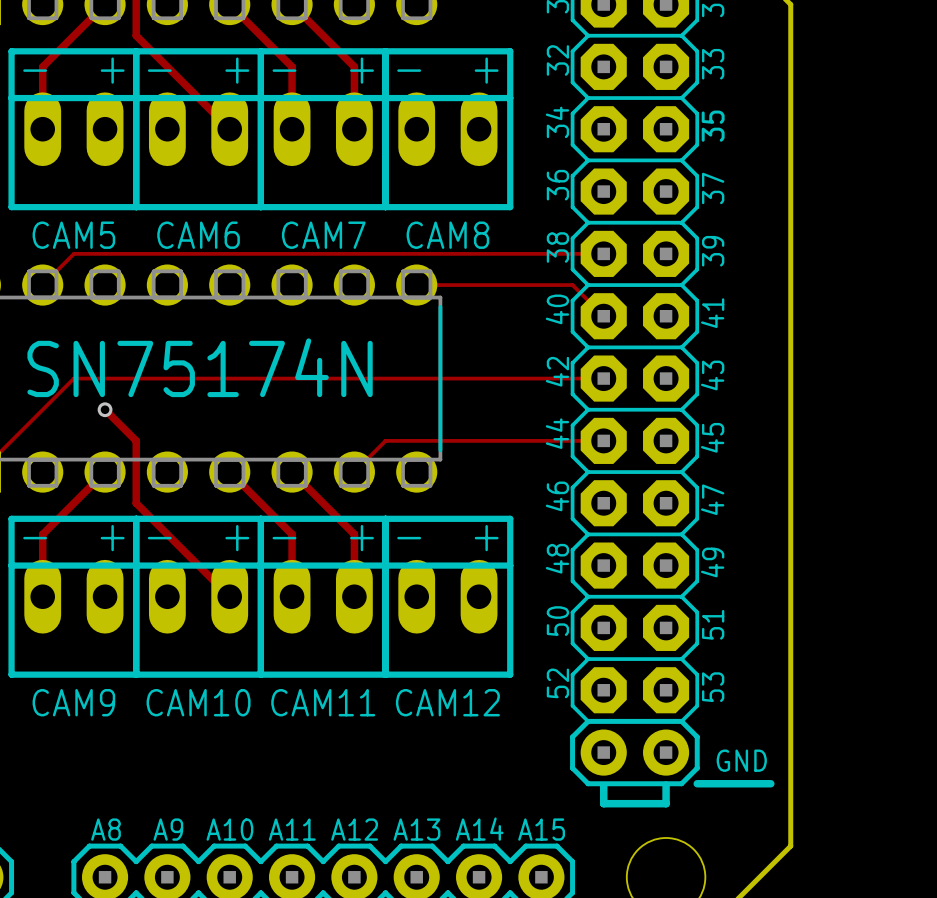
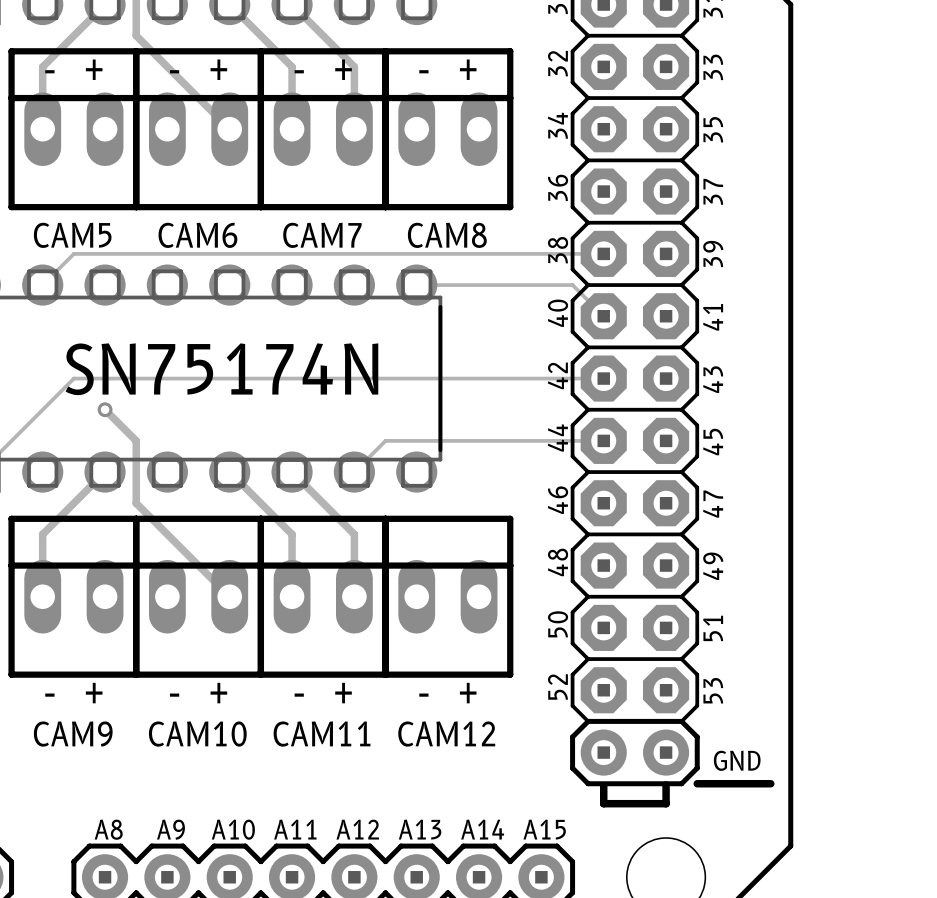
text: - + (73, 538) -> none
text: - + (198, 538) -> none
text: - + (323, 538) -> none
text: - + (447, 538) -> none
text: none -> - + (73, 693)
text: none -> - + (198, 693)
text: none -> - + (323, 693)
text: none -> - + (447, 693)
CAM9 name position: CAM9 (73, 702) -> CAM9 (73, 734)
CAM10 name position: CAM10 (198, 702) -> CAM10 (197, 734)
CAM11 name position: CAM11 (323, 702) -> CAM11 (322, 734)
CAM12 name position: CAM12 (447, 702) -> CAM12 (446, 734)

